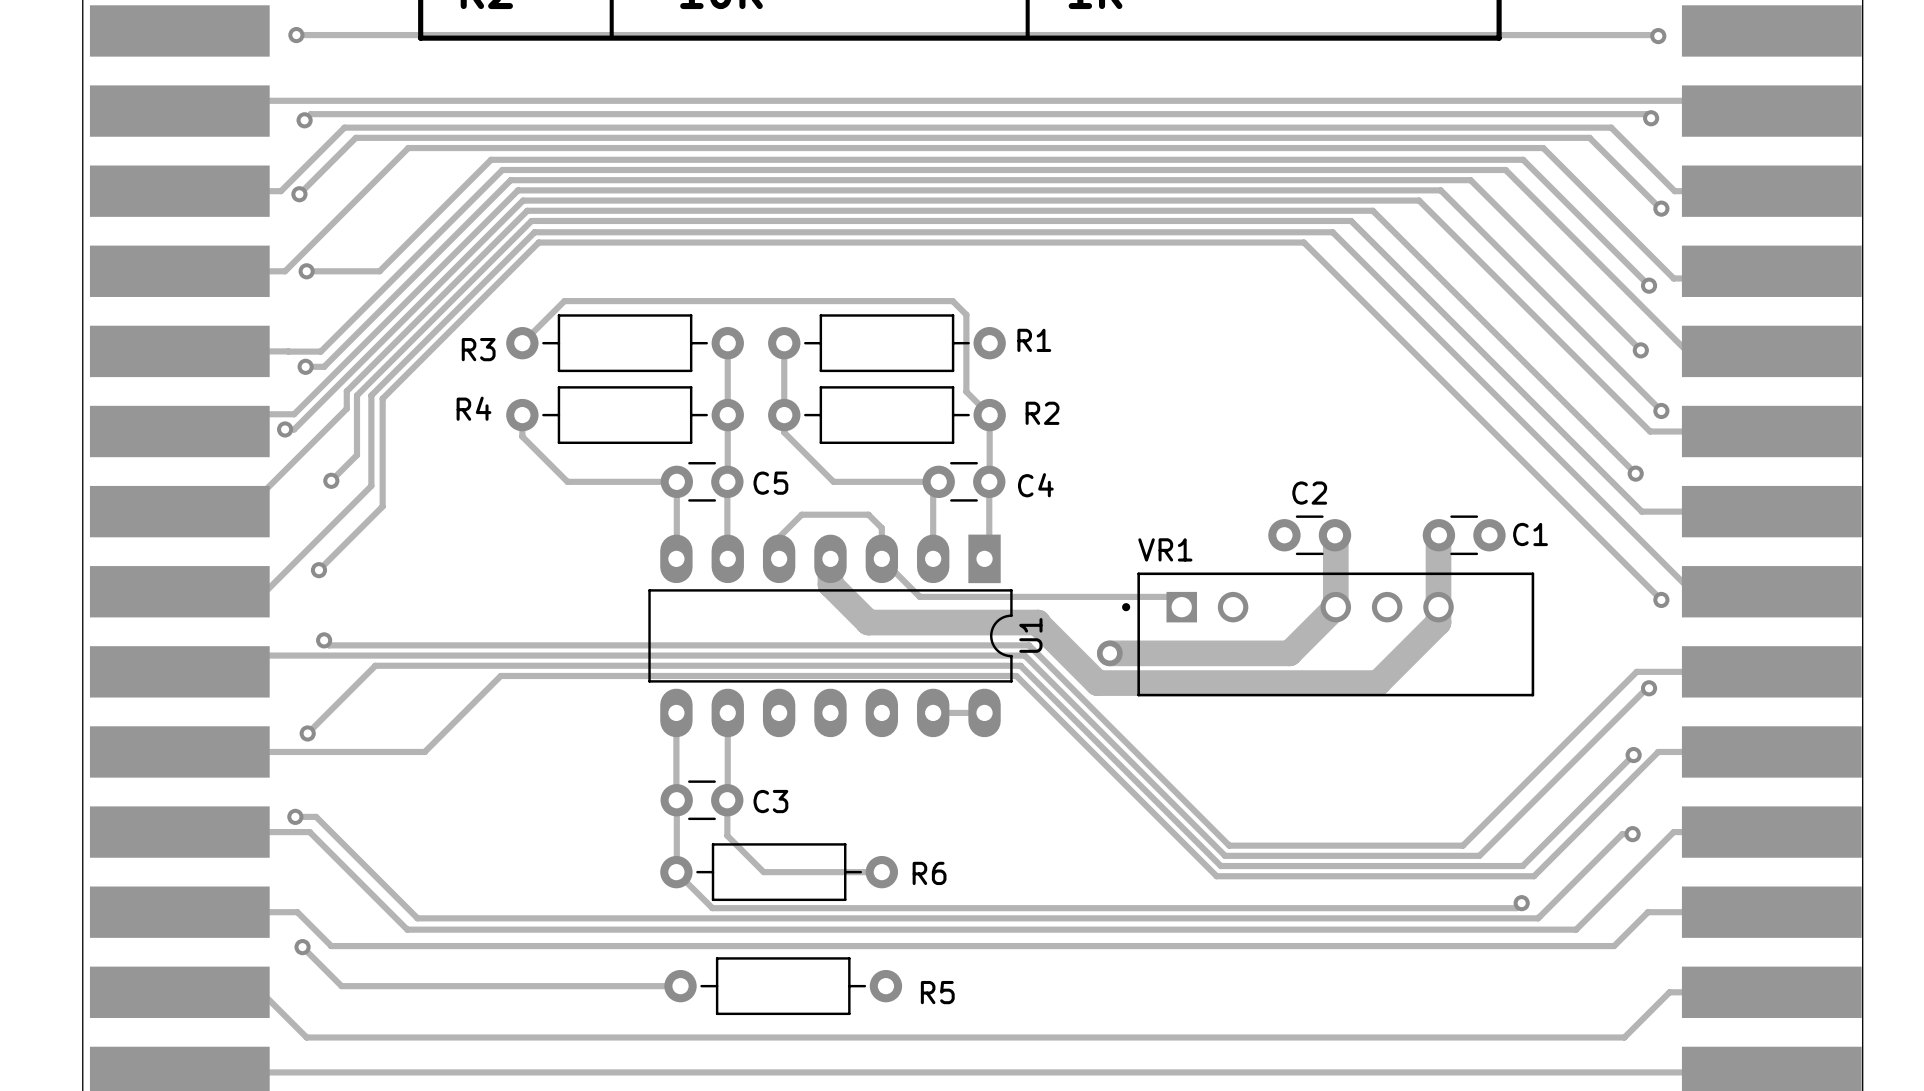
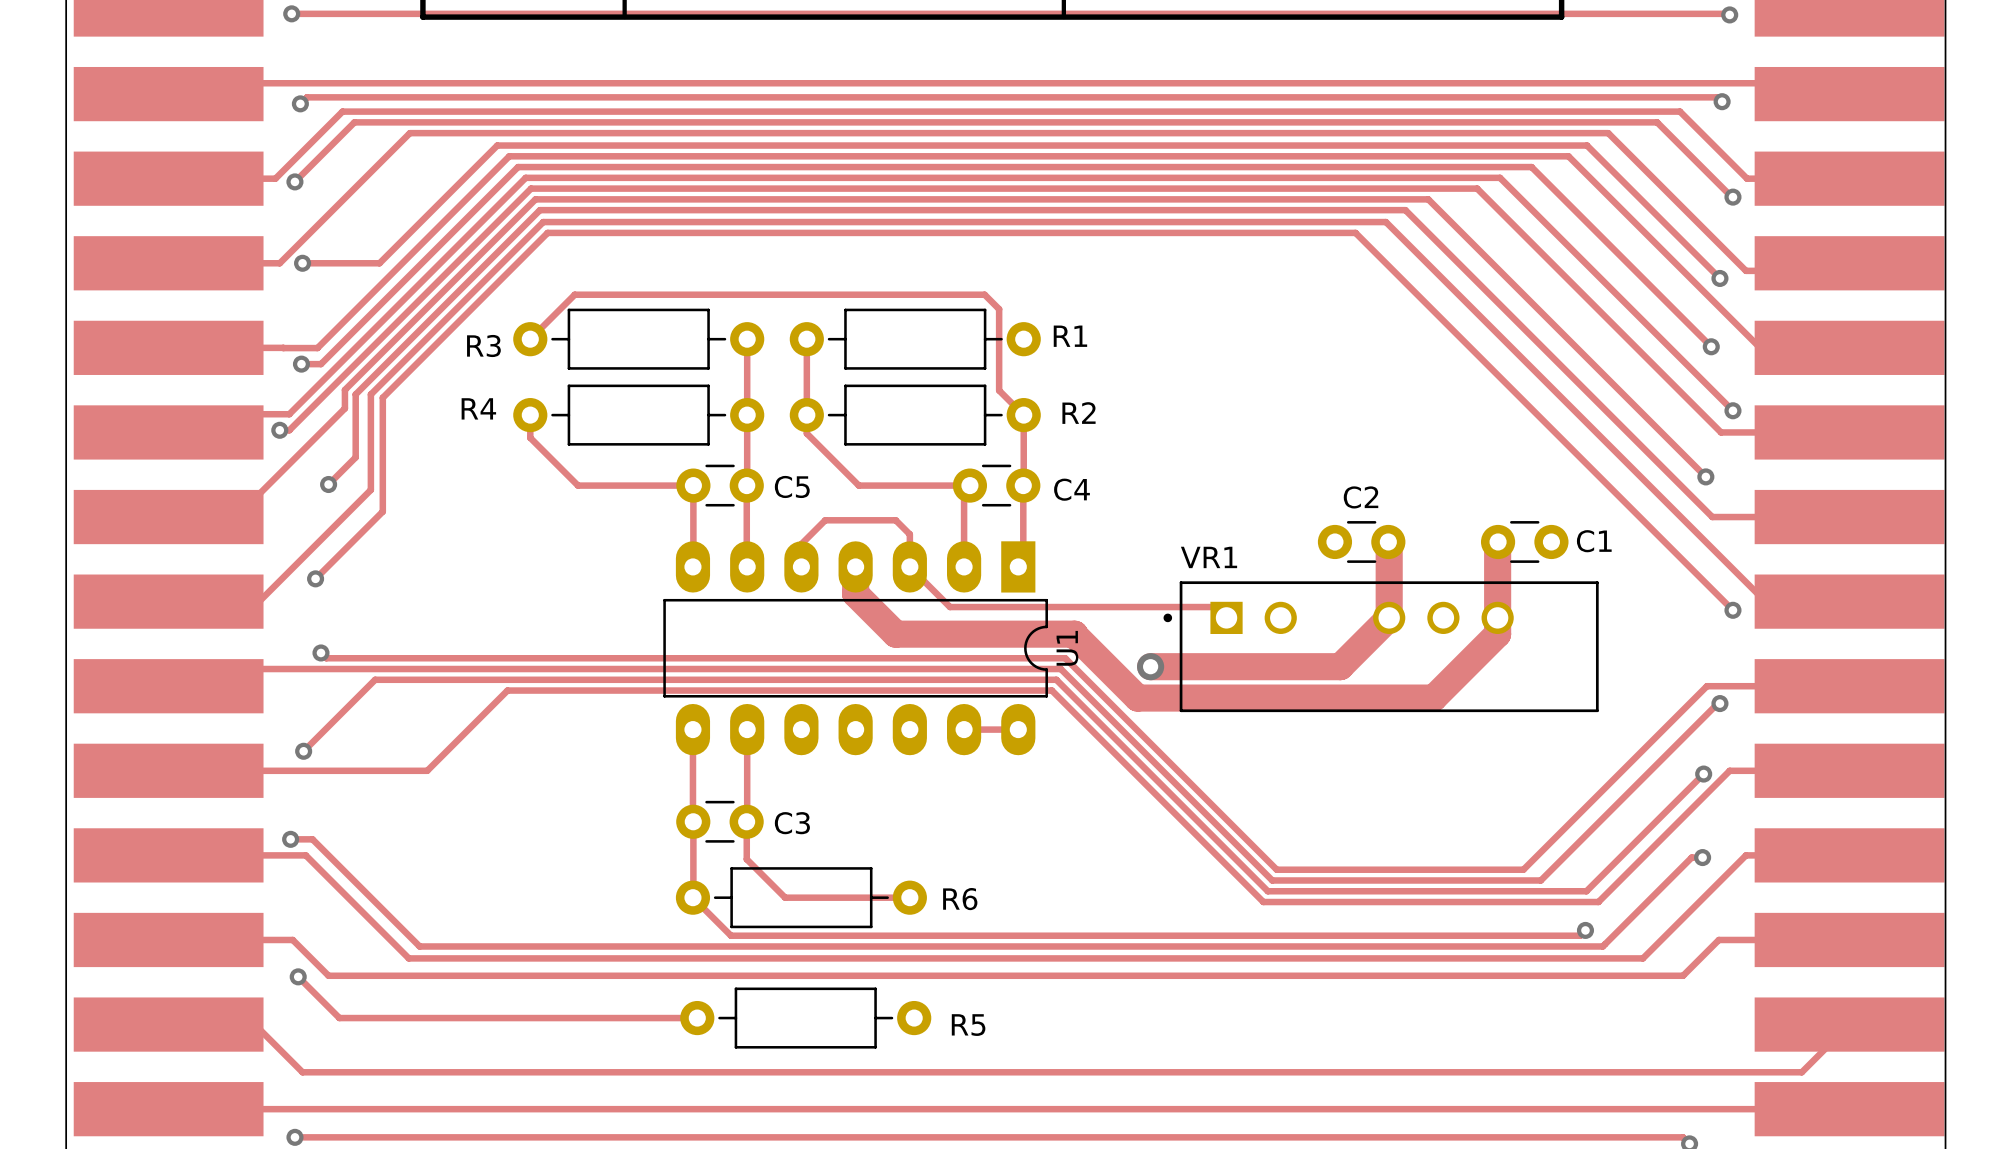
track: (1771, 992) (1669, 992) (1624, 1037) -> (1849, 1024) (1801, 1072) (1693, 1072)

